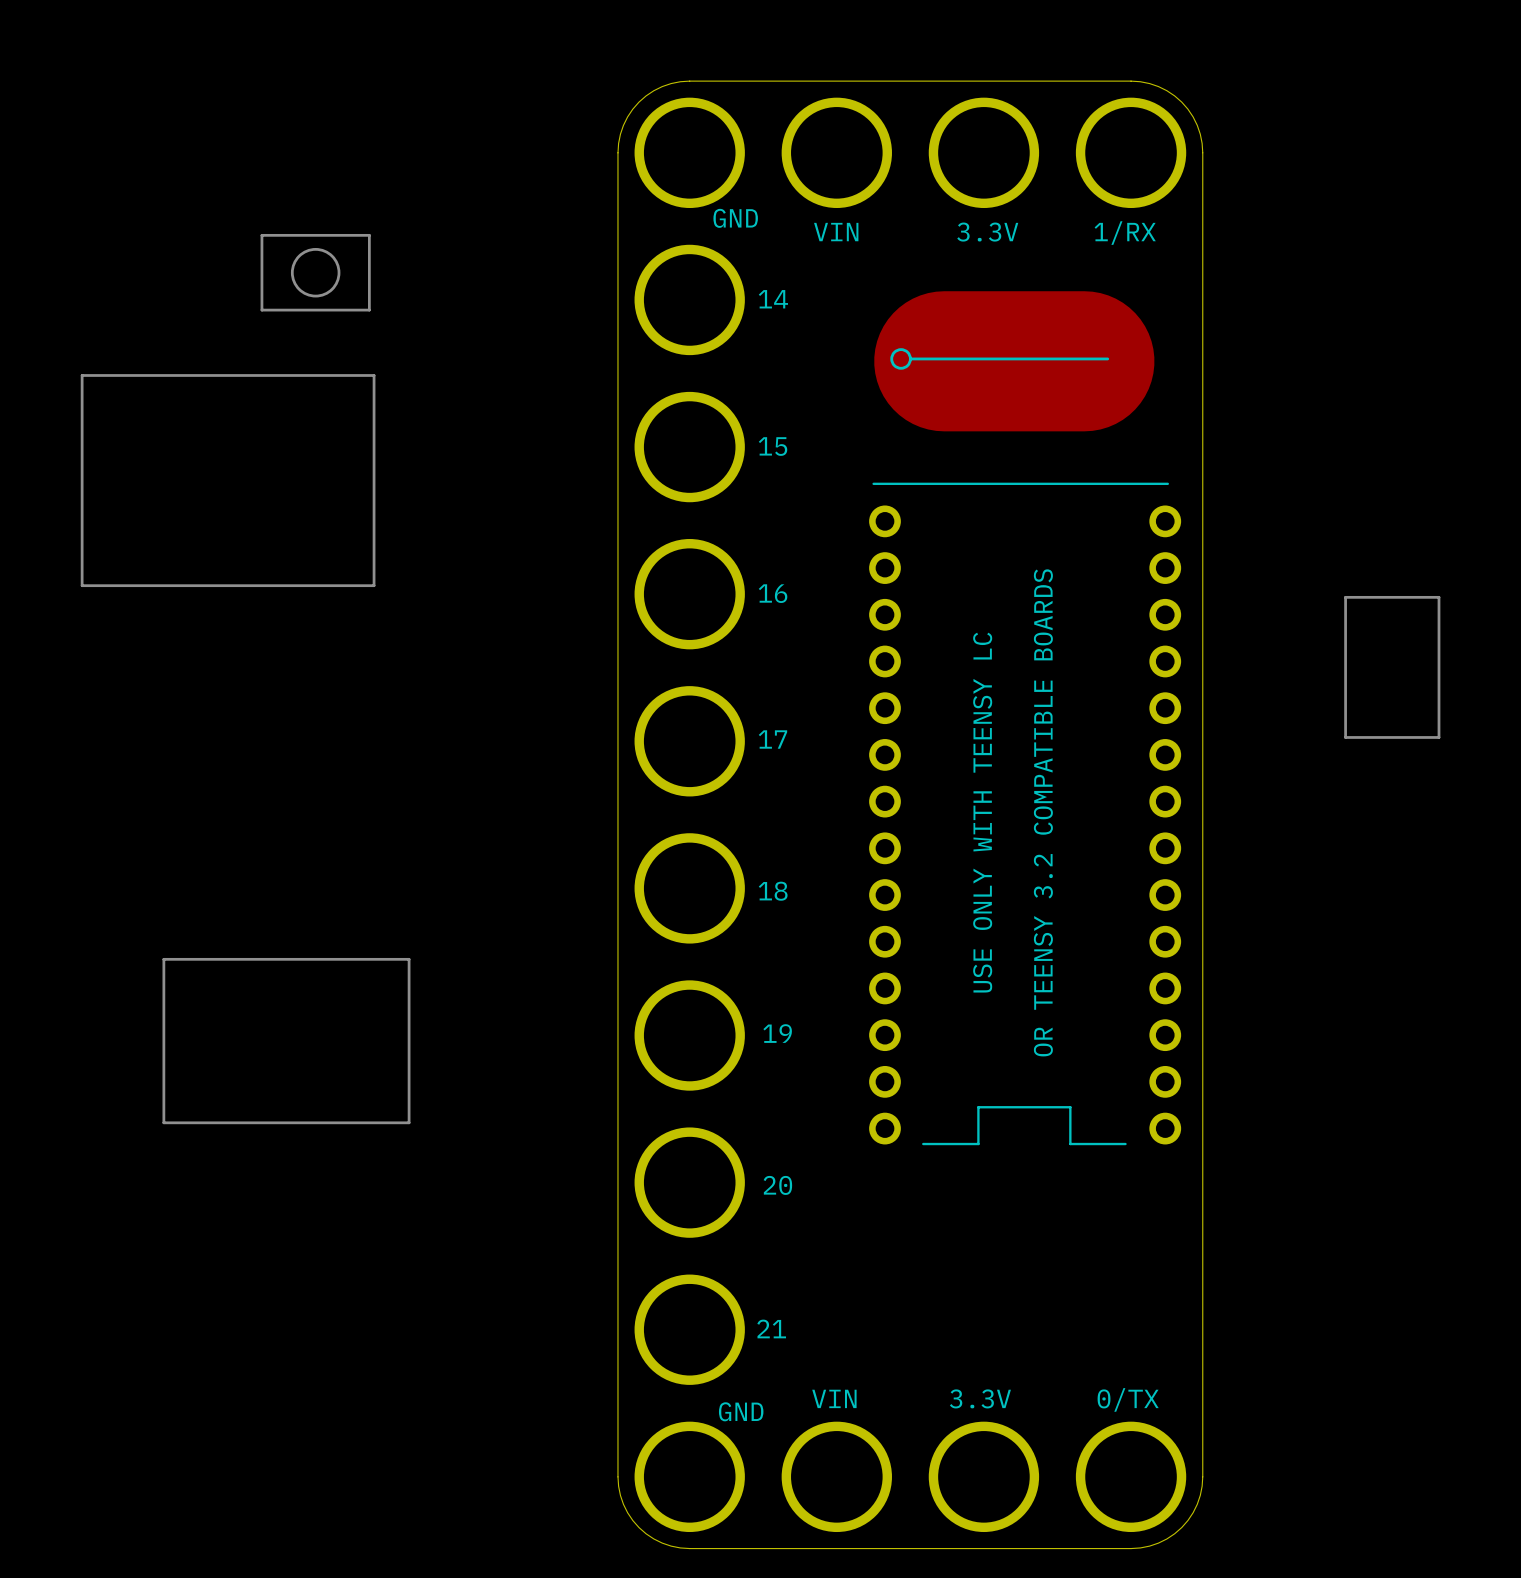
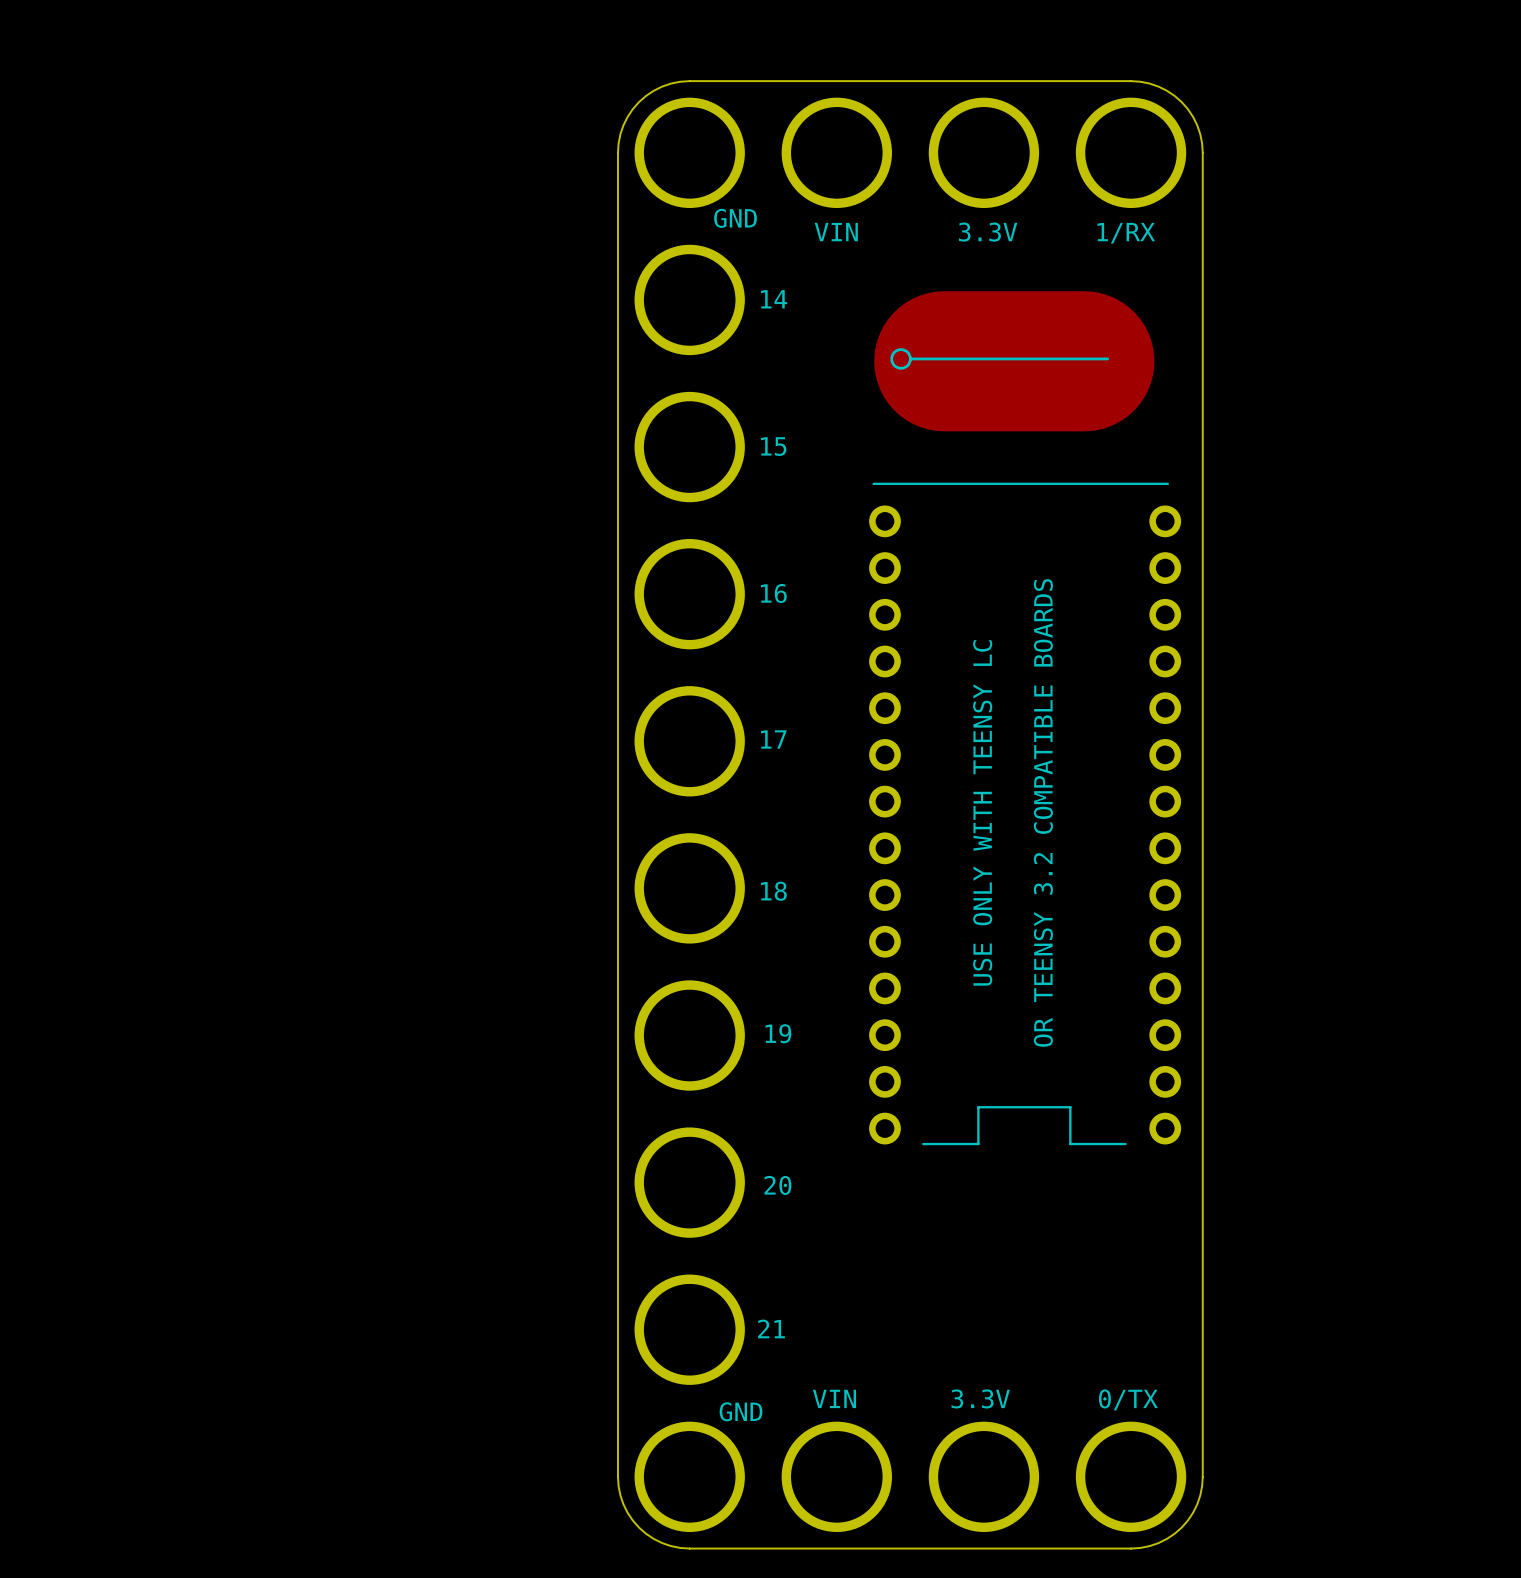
line: (261, 235) (261, 310) (369, 310) (369, 235) (261, 235) -> none
drawing: [290, 247, 341, 298] -> none
line: (82, 375) (82, 585) (374, 585) (374, 375) (82, 375) -> none
line: (1345, 597) (1345, 737) (1438, 737) (1438, 597) (1345, 597) -> none
line: (163, 959) (163, 1122) (409, 1122) (409, 959) (163, 959) -> none

